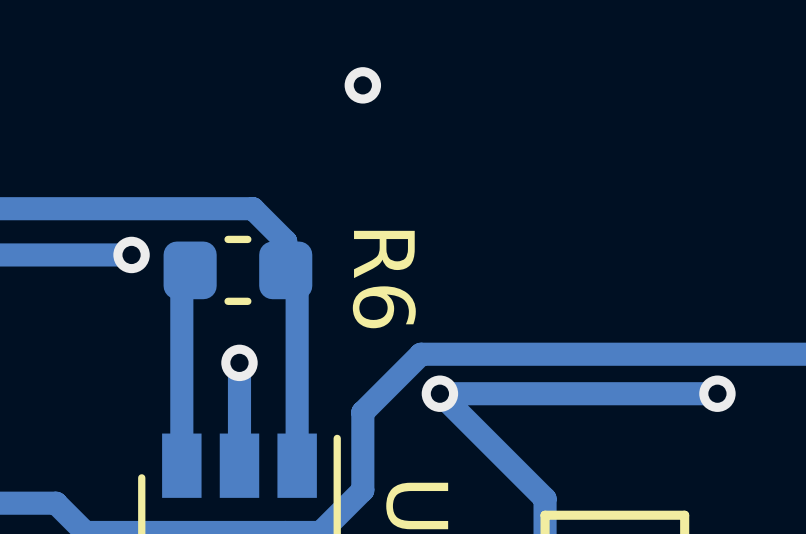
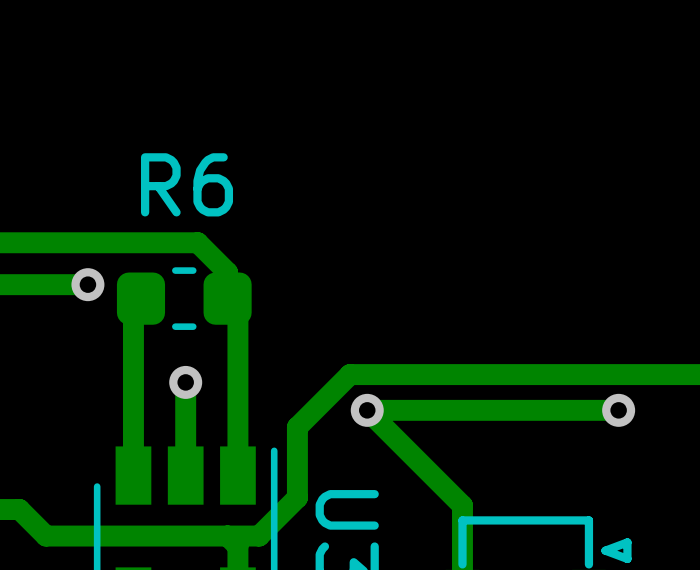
via: (362, 85) -> none
R6 name rotation: 0° (384, 279) -> 90° counterclockwise (187, 184)
R6 name position: R6 (384, 279) -> R6 (187, 184)

